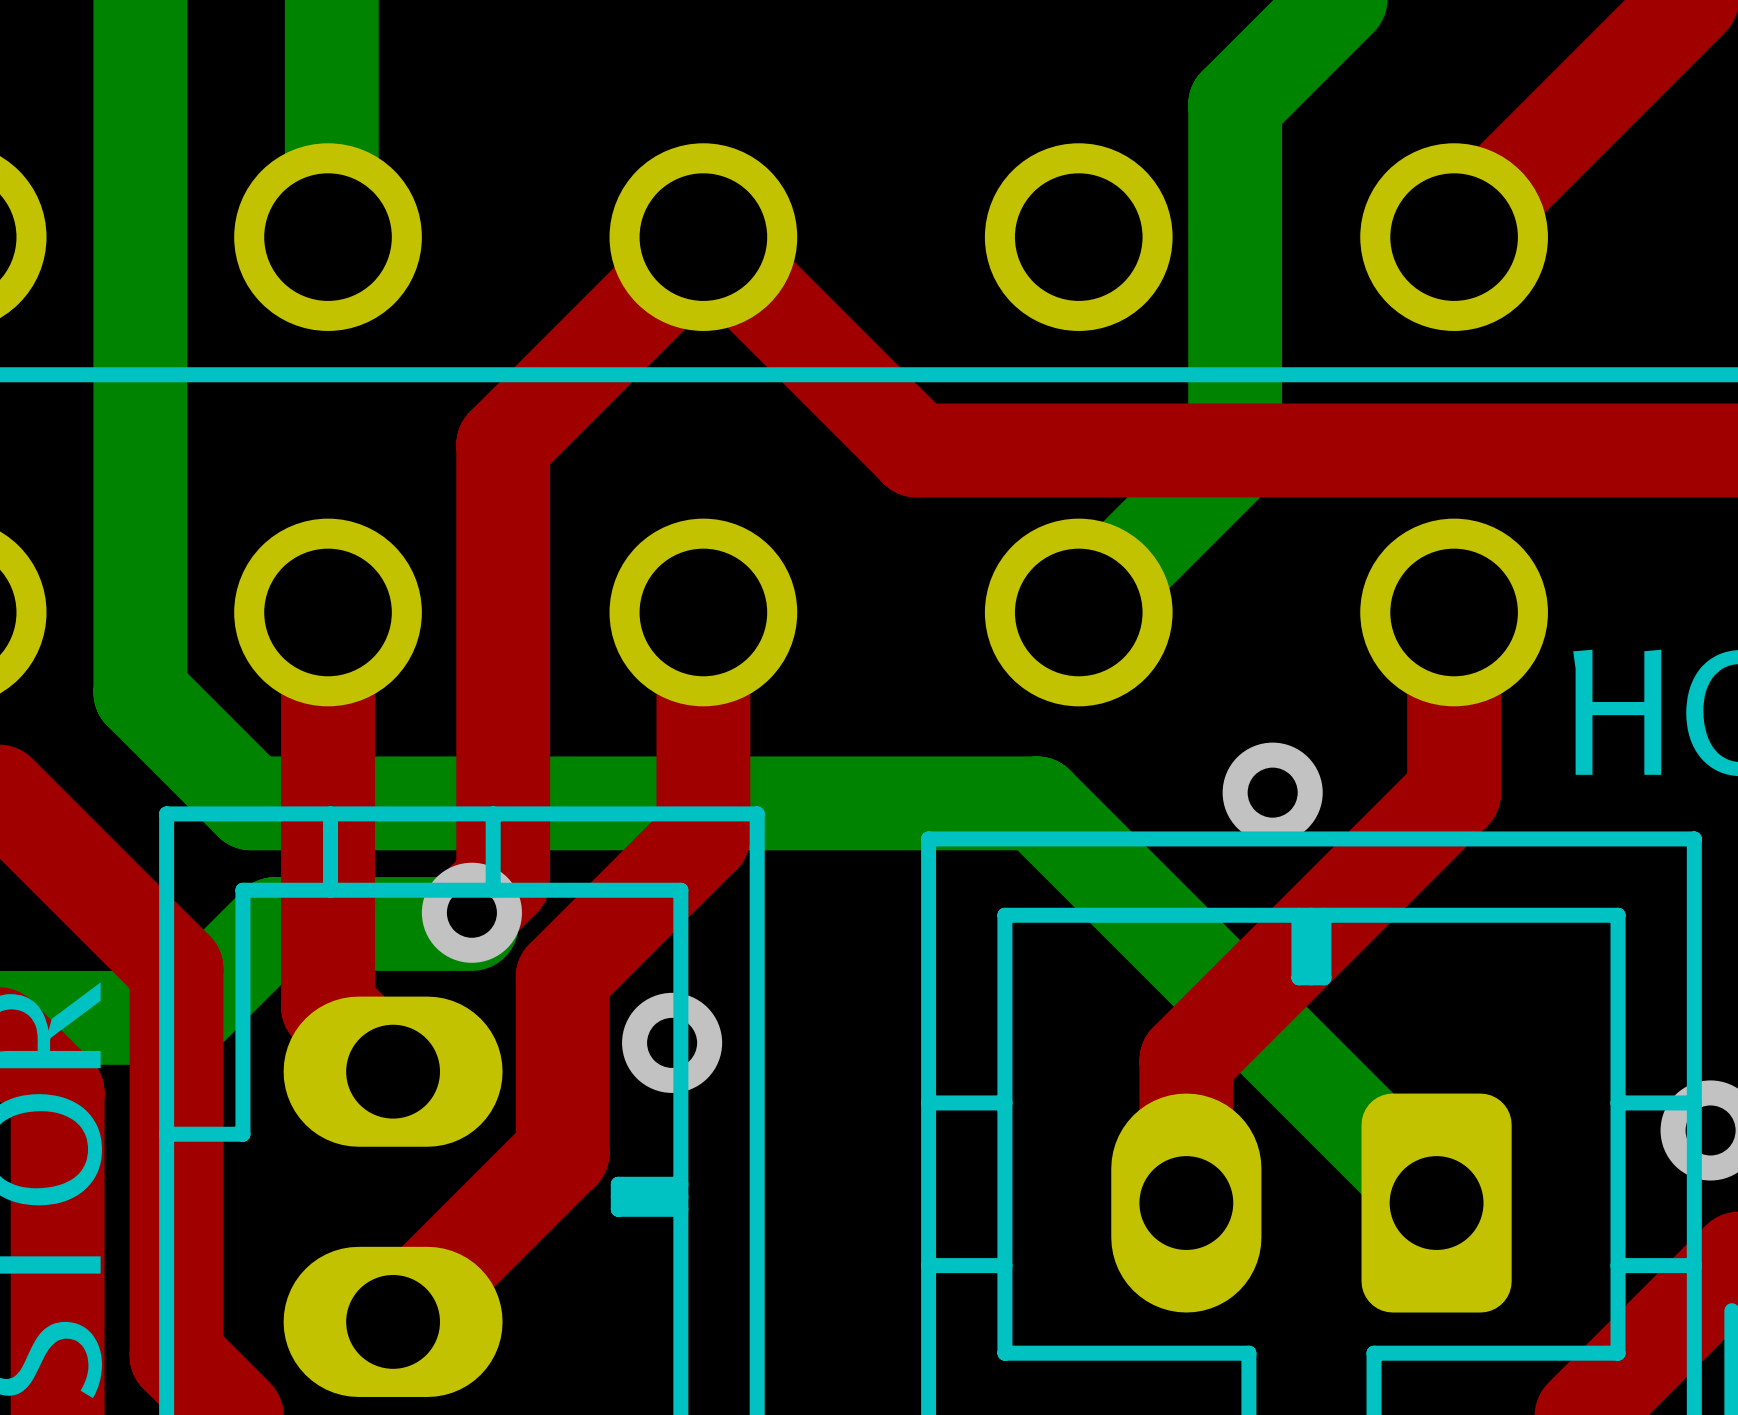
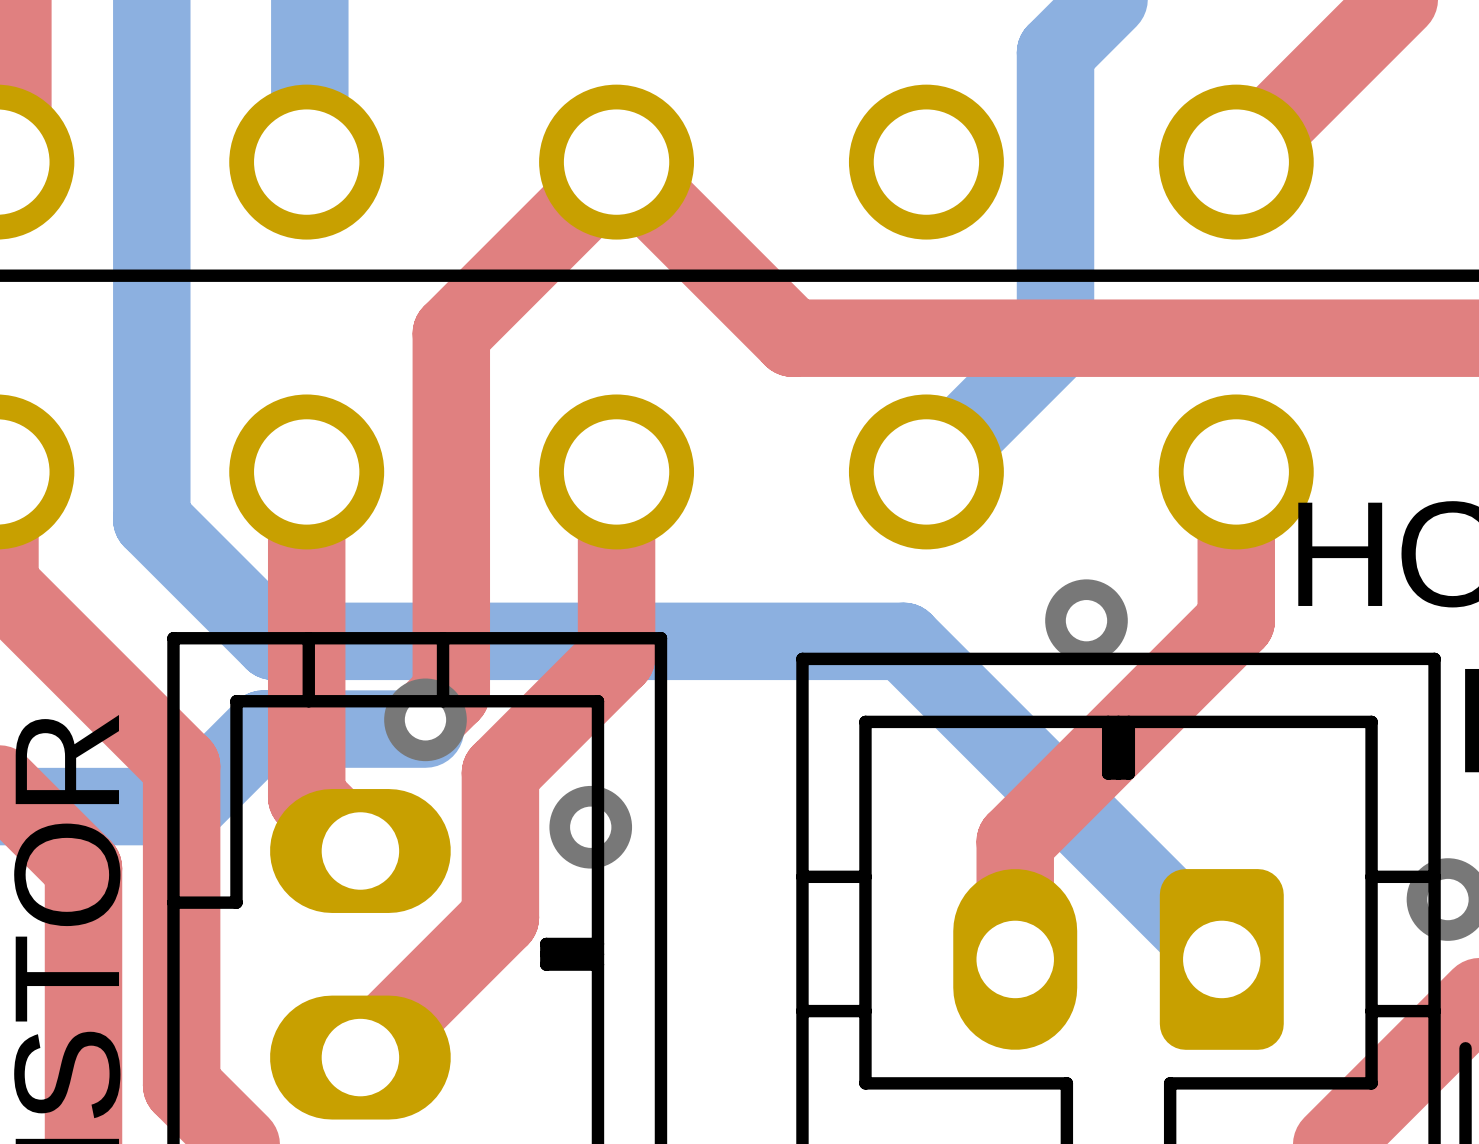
bottom track: (140, 670) (140, 692) (251, 803) (1036, 803) (1051, 817) -> (151, 519) (273, 641) (903, 641)

